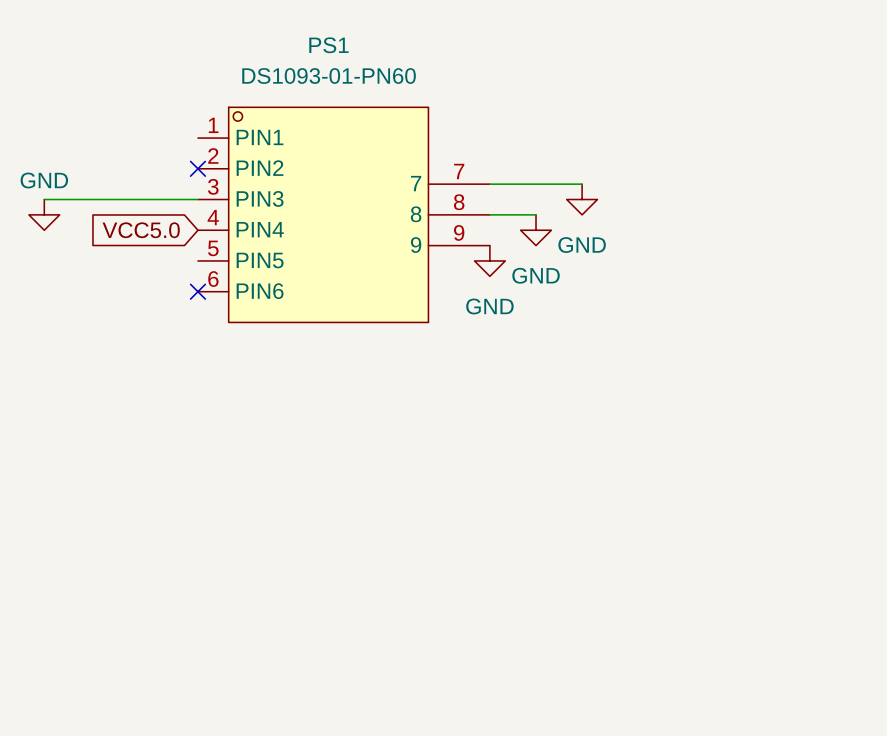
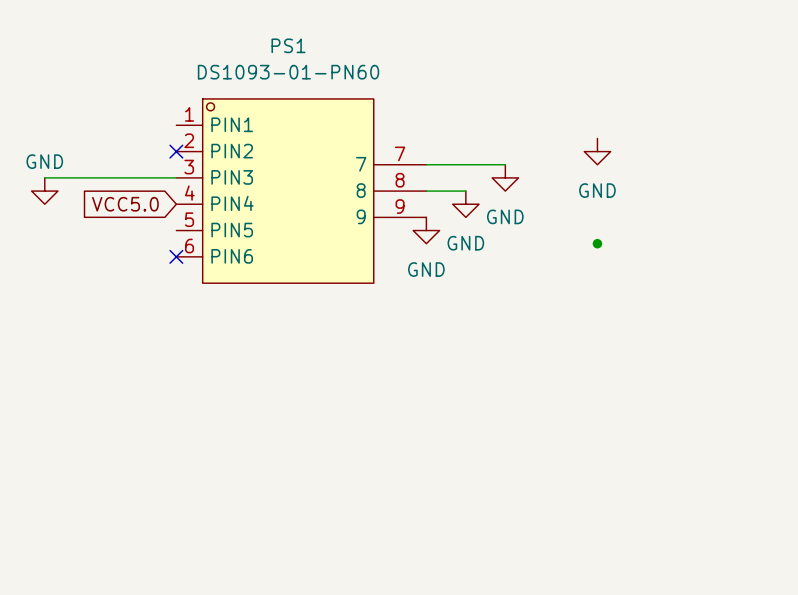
power symbol: none -> GND (597, 151)
junction: none -> (597, 243)

